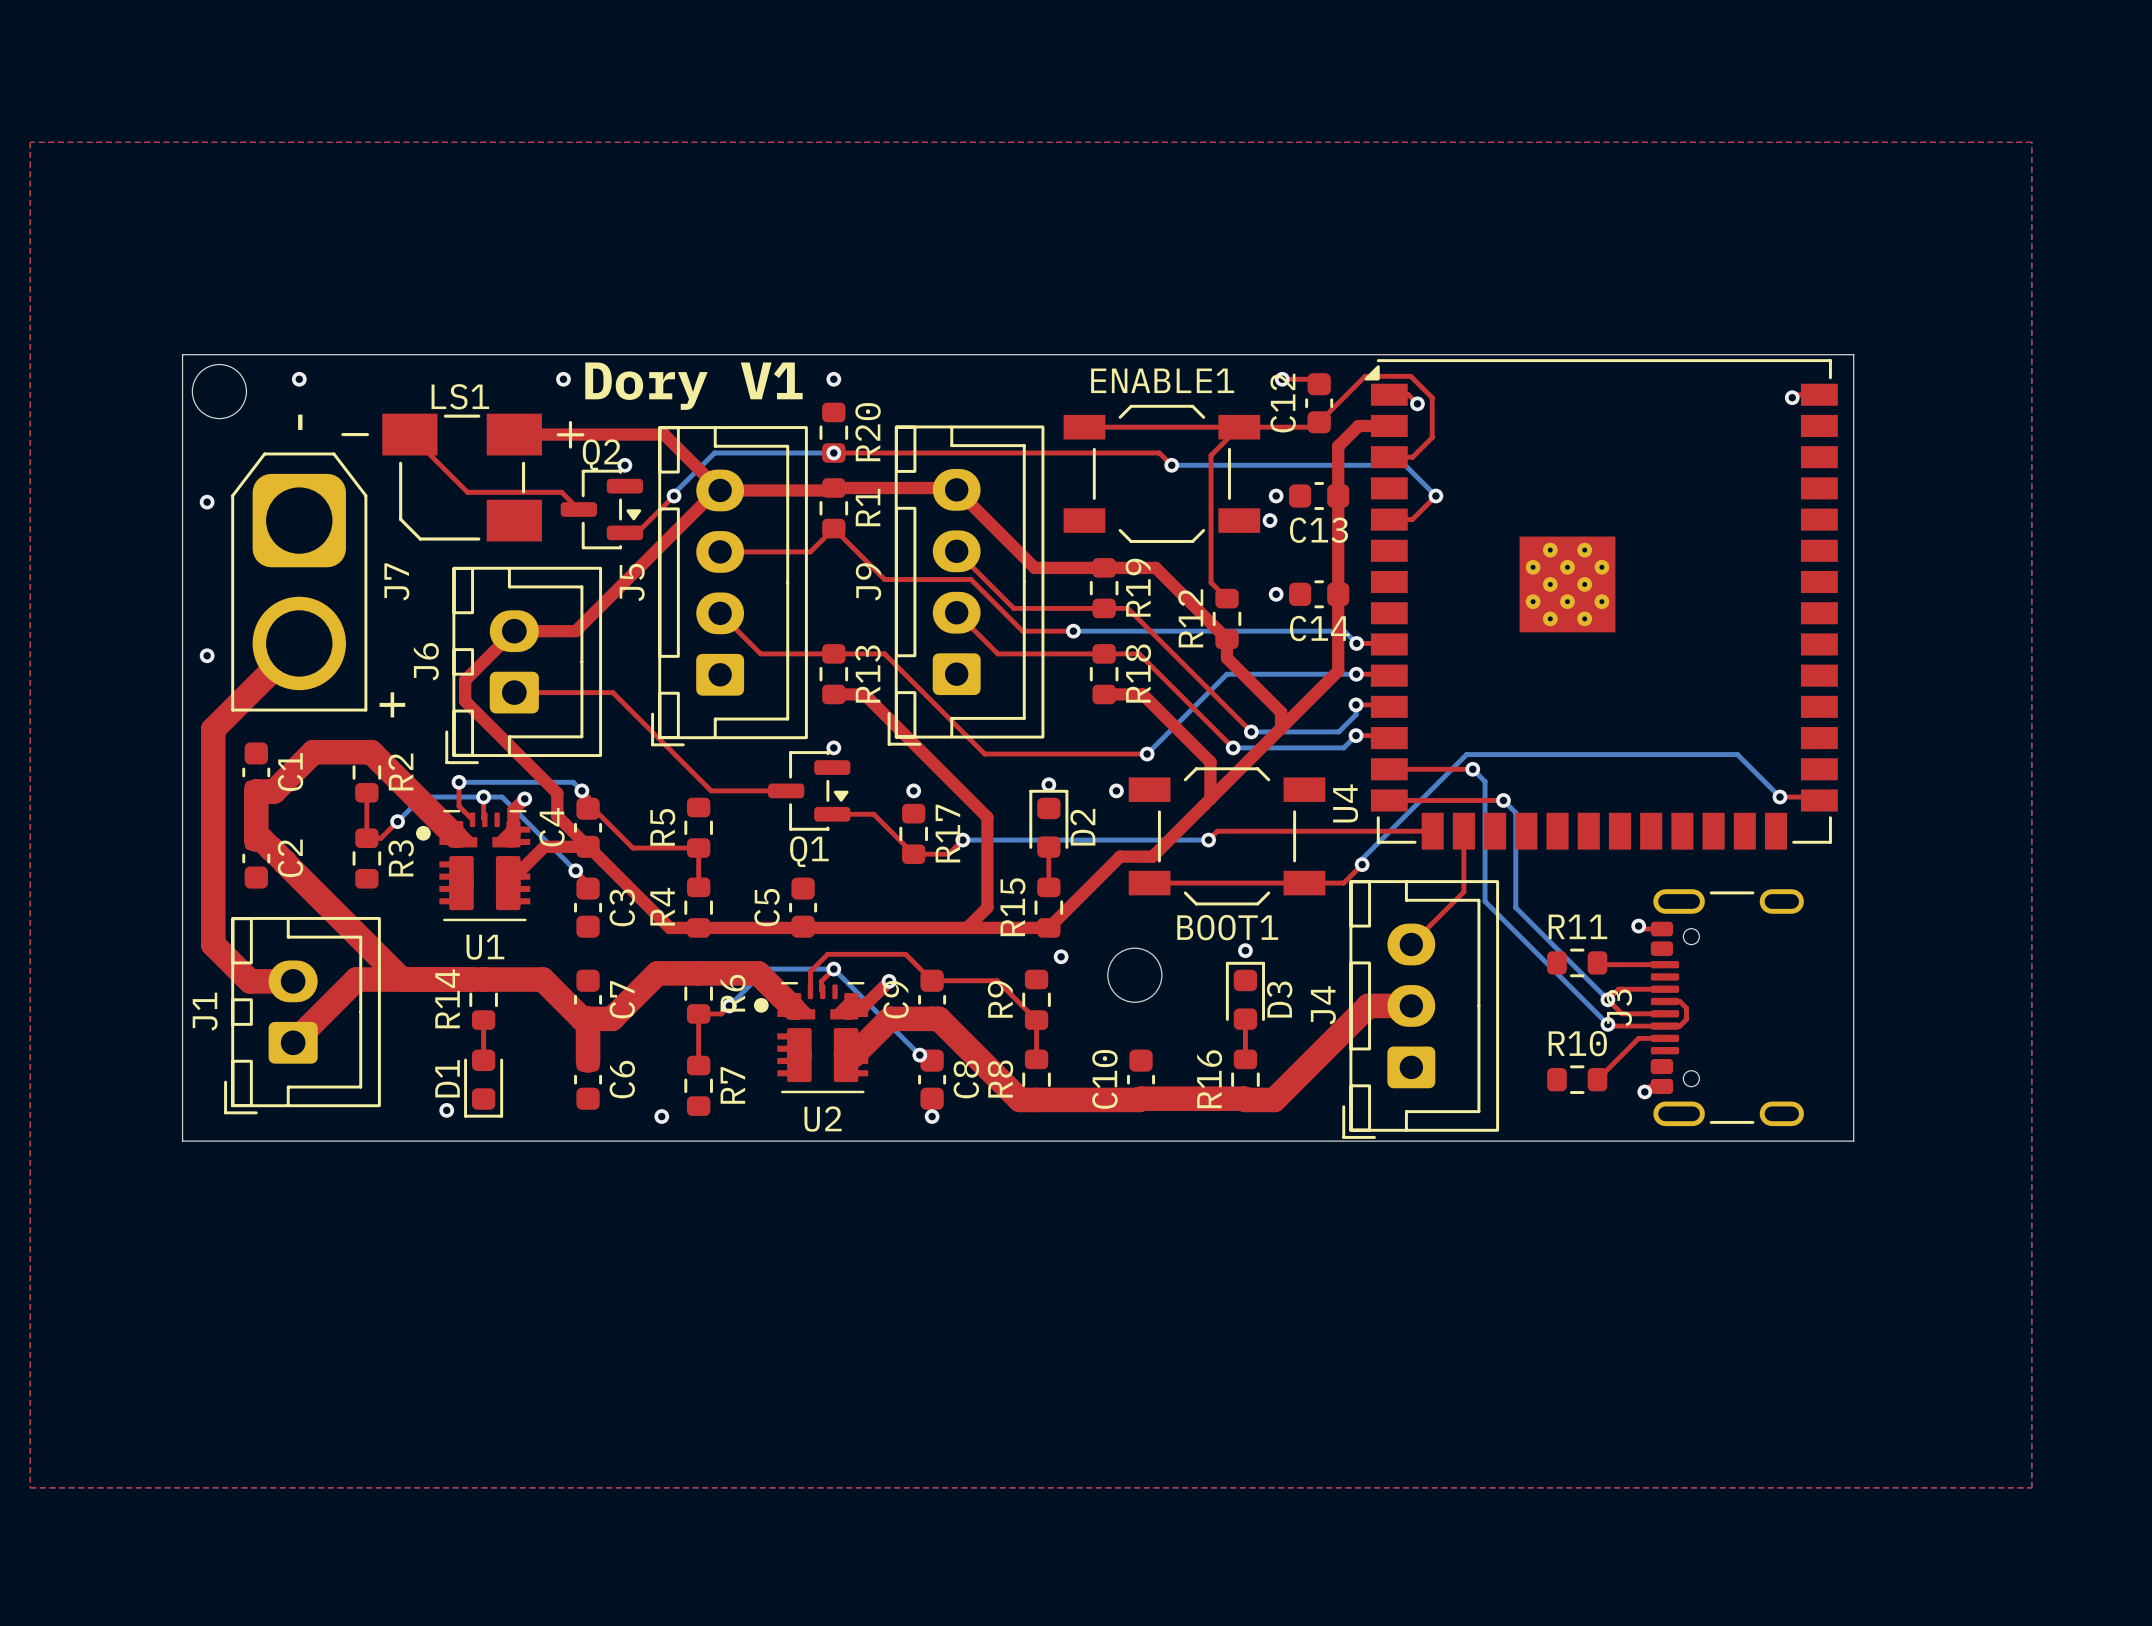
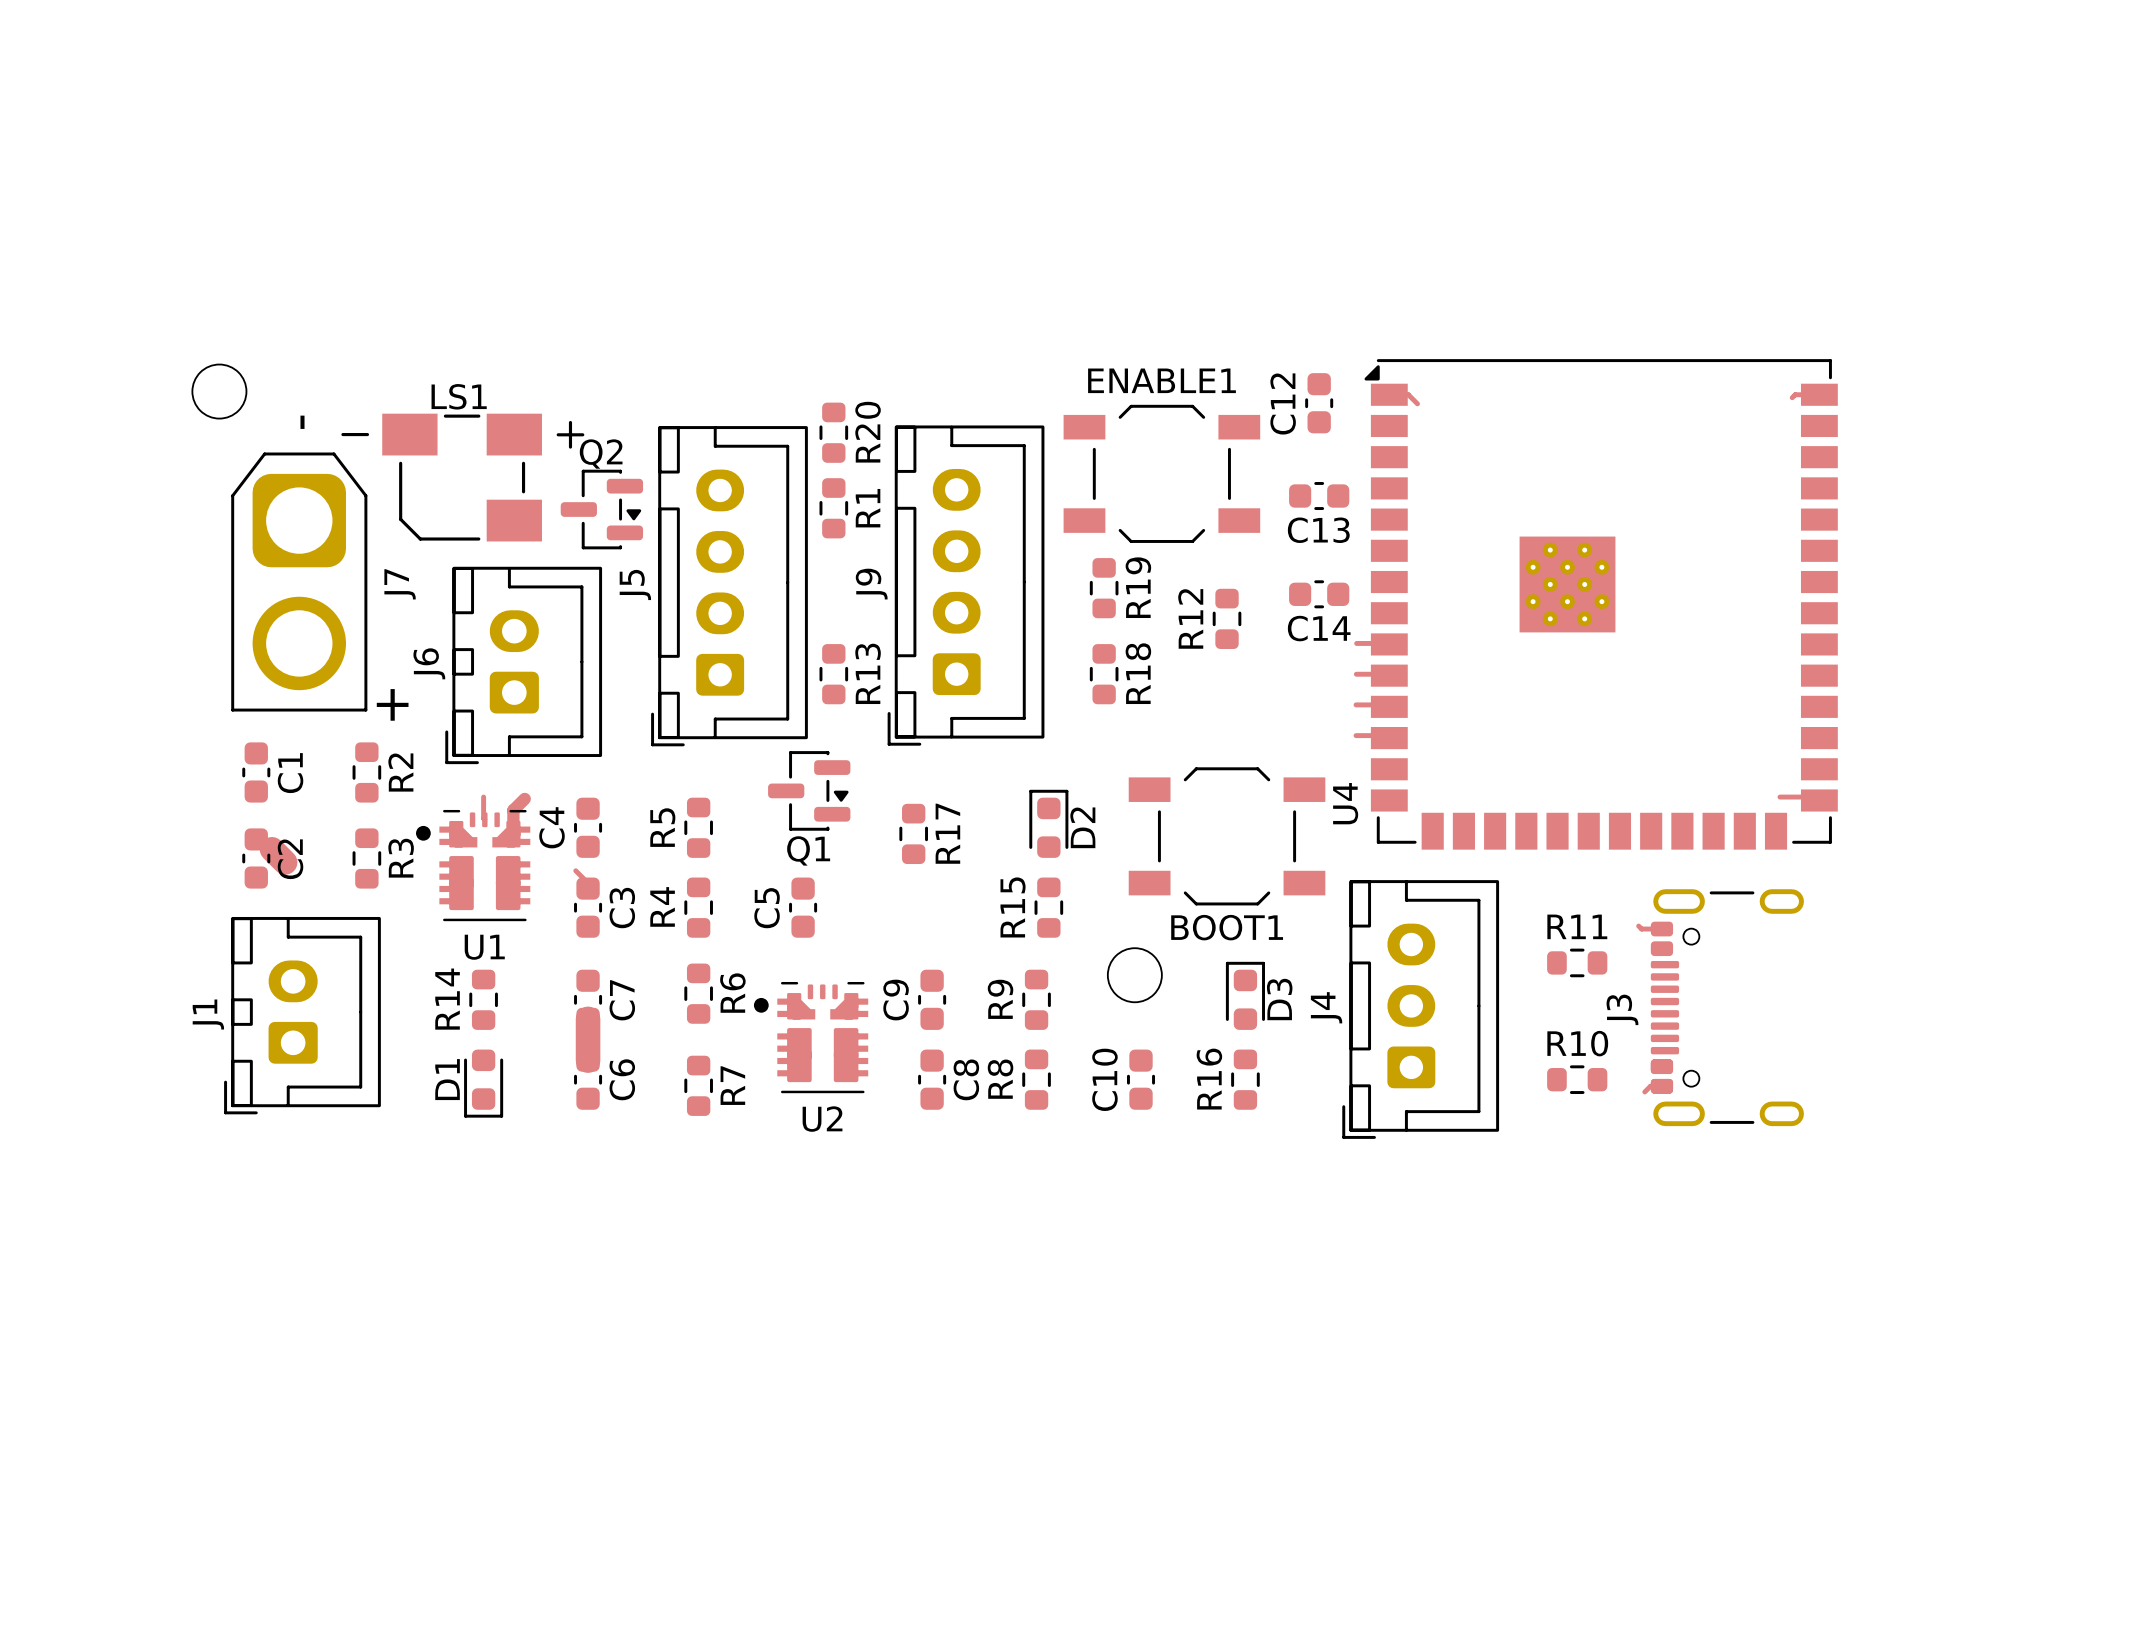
top zone outline: (30, 142) (30, 1487) (2031, 1487) (2031, 142) (30, 142) -> none
board edge: (182, 354) (1853, 354) (1853, 1141) (182, 1141) (182, 354) -> none
via: (299, 379) -> none
via: (563, 379) -> none
via: (833, 379) -> none
top track: (1282, 379) (1314, 379) (1319, 384) -> none
via: (1282, 379) -> none
text: Dory V1 (693, 386) -> none
via: (1792, 397) -> none
via: (1417, 403) -> none
top track: (1389, 425) (1358, 425) (1338, 446) (1338, 671) (1152, 856) (1120, 856) (1048, 927) (669, 927) (588, 846) (544, 846) (508, 883) -> none
top track: (1084, 427) (1314, 427) (1365, 376) (1410, 376) (1432, 397) (1432, 437) (1412, 457) (1389, 457) -> none
top track: (1239, 427) (1211, 455) (1211, 582) (1227, 598) -> none
top track: (409, 434) (467, 492) (561, 492) (578, 509) -> none
top track: (514, 434) (664, 434) (720, 490) -> none
top track: (833, 452) (1159, 452) (1171, 465) -> none
bottom track: (833, 452) (714, 452) (674, 493) (674, 496) -> none
via: (833, 452) -> none
via: (624, 465) -> none
bottom track: (1171, 465) (1405, 465) (1435, 496) -> none
via: (1171, 465) -> none
top track: (674, 496) (637, 532) (624, 532) -> none
via: (674, 496) -> none
via: (1276, 496) -> none
top track: (1435, 496) (1412, 519) (1389, 519) -> none
via: (1435, 496) -> none
via: (207, 502) -> none
via: (1270, 520) -> none
top track: (720, 551) (810, 551) (833, 528) (884, 579) (971, 579) (1022, 631) (1073, 631) -> none
top track: (956, 551) (1013, 608) (1127, 608) (1251, 731) -> none
via: (1276, 594) -> none
top track: (956, 612) (997, 653) (1139, 653) (1233, 747) -> none
top track: (720, 613) (760, 653) (884, 653) (984, 754) (1147, 754) -> none
bottom track: (1073, 631) (1344, 631) (1356, 643) -> none
via: (1073, 631) -> none
top track: (299, 643) (213, 729) (213, 944) (250, 981) (293, 981) -> none
via: (1356, 643) -> none
via: (207, 655) -> none
bottom track: (1356, 674) (1226, 674) (1147, 754) -> none
via: (1356, 674) -> none
top track: (514, 692) (612, 692) (711, 790) (786, 790) -> none
top track: (833, 694) (864, 694) (987, 817) (987, 907) (968, 927) -> none
top track: (1104, 694) (1142, 694) (1210, 762) (1210, 798) -> none
bottom track: (1356, 704) (1356, 714) (1338, 731) (1251, 731) -> none
via: (1356, 704) -> none
top track: (1281, 728) (1281, 712) (1227, 658) (1227, 639) (1155, 567) (1034, 567) (954, 488) (716, 490) (575, 631) (514, 631) (465, 680) (465, 701) (557, 793) (557, 816) (588, 846) -> none
via: (1251, 731) -> none
bottom track: (1356, 735) (1343, 747) (1233, 747) -> none
via: (1356, 735) -> none
via: (833, 747) -> none
via: (1233, 747) -> none
via: (1147, 754) -> none
top track: (1389, 769) (1472, 769) -> none
bottom track: (1472, 769) (1485, 781) (1485, 901) (1607, 1024) -> none
via: (1472, 769) -> none
top track: (459, 782) (459, 806) (472, 819) -> none
bottom track: (459, 782) (573, 782) (581, 790) -> none
via: (459, 782) -> none
via: (1048, 784) -> none
top track: (581, 790) (588, 797) (588, 808) (593, 808) (632, 848) (698, 848) (698, 887) -> none
via: (581, 790) -> none
via: (913, 790) -> none
via: (1116, 790) -> none
top track: (366, 792) (366, 838) (381, 838) (397, 821) -> none
via: (483, 797) -> none
bottom track: (1779, 797) (1737, 754) (1466, 754) (1362, 859) (1362, 864) -> none
via: (1779, 797) -> none
via: (524, 798) -> none
top track: (1389, 800) (1503, 800) -> none
bottom track: (1503, 800) (1515, 812) (1515, 907) (1607, 999) -> none
via: (1503, 800) -> none
top track: (832, 814) (873, 814) (913, 854) (948, 854) (962, 840) -> none
bottom track: (397, 821) (422, 797) (502, 797) (575, 870) -> none
via: (397, 821) -> none
top track: (1432, 831) (1217, 831) (1208, 840) -> none
top track: (1463, 831) (1463, 891) (1411, 944) -> none
top track: (454, 835) (371, 752) (313, 752) (274, 791) (256, 791) (256, 839) (261, 839) (271, 849) -> none
bottom track: (962, 840) (1208, 840) -> none
via: (962, 840) -> none
via: (1208, 840) -> none
top track: (1048, 847) (1048, 887) -> none
top track: (285, 862) (401, 979) -> none
top track: (1362, 864) (1343, 883) (1149, 883) -> none
via: (1362, 864) -> none
via: (575, 870) -> none
via: (1638, 926) -> none
via: (1245, 950) -> none
via: (1061, 956) -> none
top track: (1597, 962) (1599, 964) (1664, 964) -> none
top track: (833, 969) (821, 981) (822, 991) -> none
via: (833, 969) -> none
top track: (889, 981) (864, 1006) (851, 1006) -> none
via: (889, 981) -> none
top track: (1664, 989) (1618, 989) (1607, 999) (1621, 1013) (1664, 1013) -> none
top track: (810, 991) (810, 971) (827, 954) (905, 954) (932, 980) (997, 980) (1036, 1020) (1036, 1059) -> none
via: (1607, 999) -> none
top track: (1664, 1001) (1679, 1001) (1686, 1008) (1686, 1019) (1679, 1026) (1609, 1026) (1607, 1024) -> none
top track: (729, 1005) (721, 1013) (698, 1013) (698, 1065) -> none
bottom track: (729, 1005) (766, 969) (833, 969) (919, 1055) -> none
via: (729, 1005) -> none
top track: (1411, 1005) (1368, 1005) (1274, 1099) (1019, 1099) (938, 1018) (890, 1018) (853, 1055) (846, 1055) -> none
top track: (792, 1007) (758, 973) (657, 973) (612, 1018) (582, 1018) (542, 979) (356, 979) (293, 1042) -> none
top track: (1245, 1019) (1245, 1059) -> none
top track: (483, 1020) (483, 1060) -> none
via: (1607, 1024) -> none
top track: (1664, 1038) (1638, 1038) (1597, 1079) -> none
via: (919, 1055) -> none
via: (1644, 1091) -> none
via: (446, 1110) -> none
via: (661, 1116) -> none
via: (932, 1116) -> none

